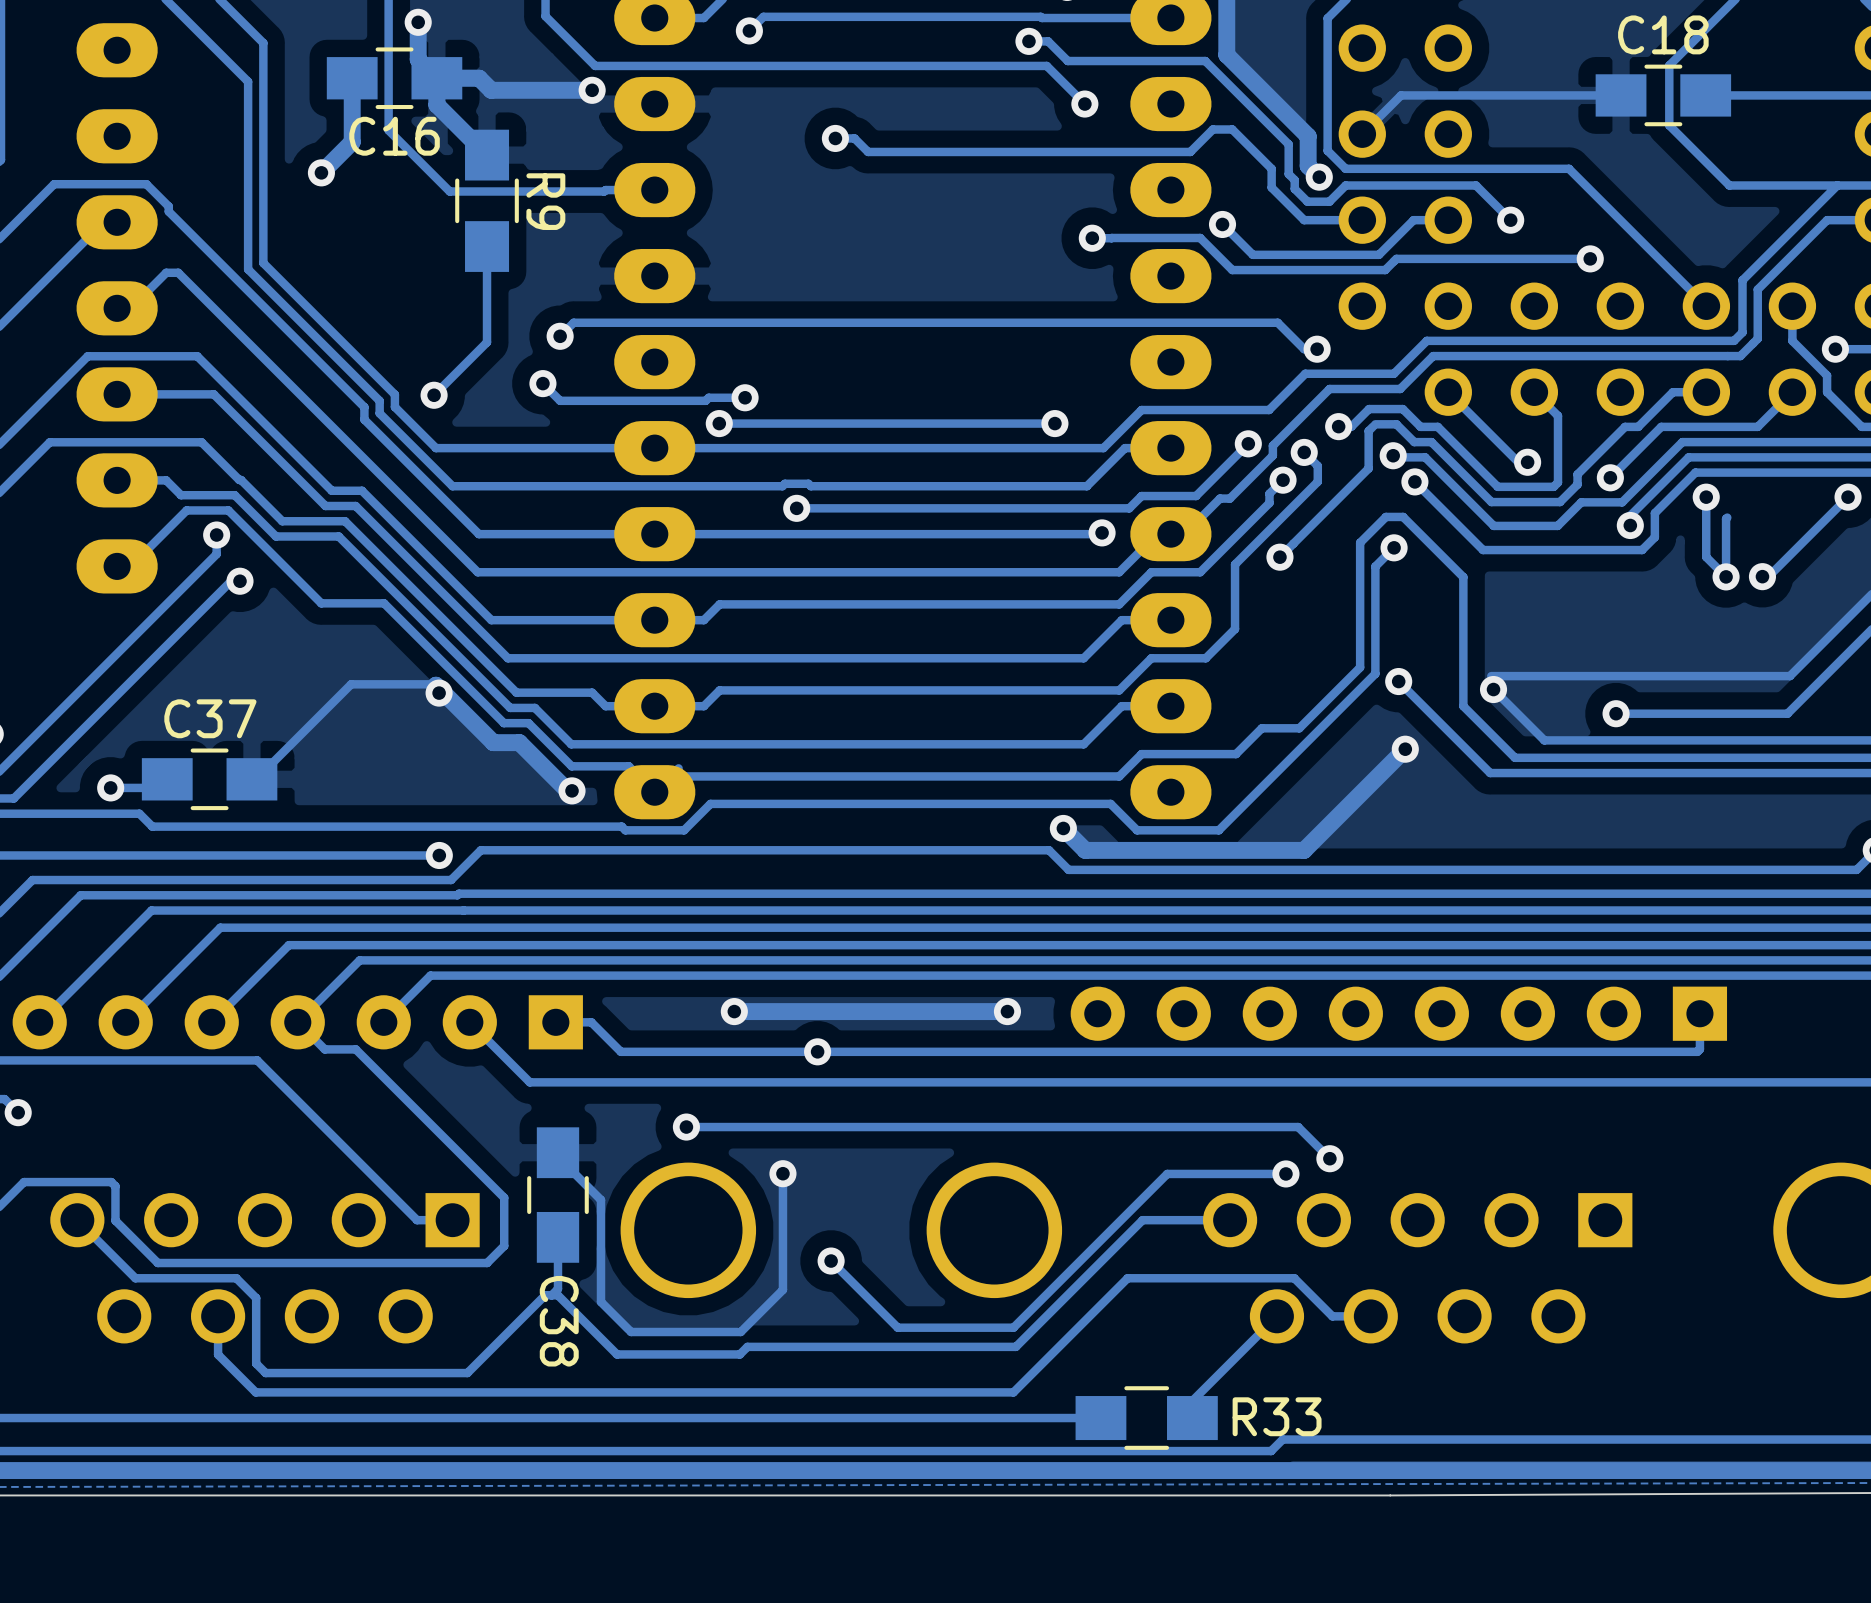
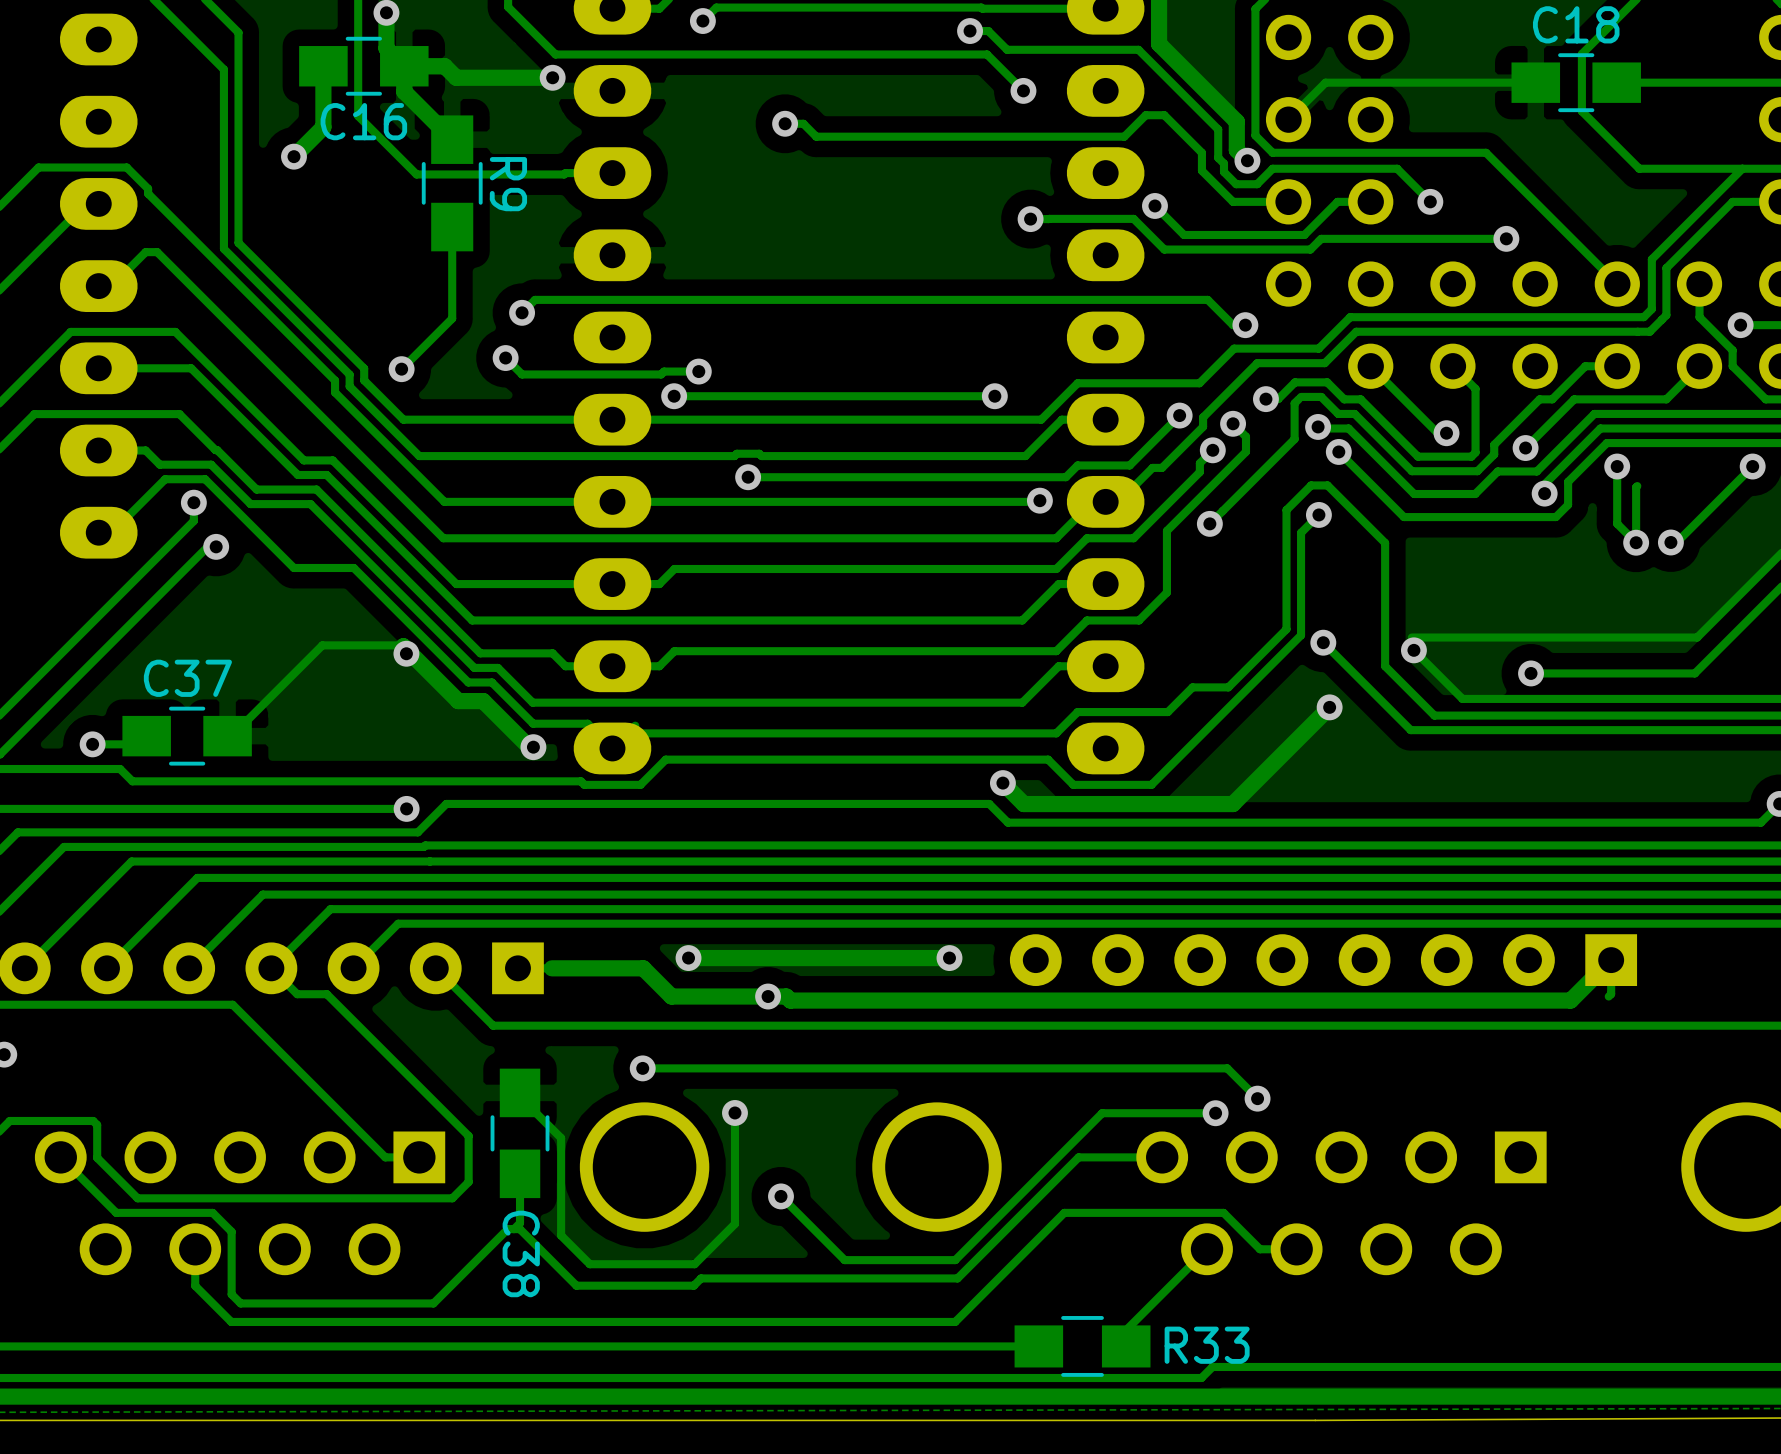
track: (591, 1022) (620, 1051) (716, 1051) -> (551, 968) (643, 968) (671, 996)
track width: thin (836, 1051) (716, 1051) -> thick (786, 996) (671, 996)
track: (1697, 1051) (836, 1051) -> (1611, 960) (1570, 1000) (790, 1000) (786, 996)

